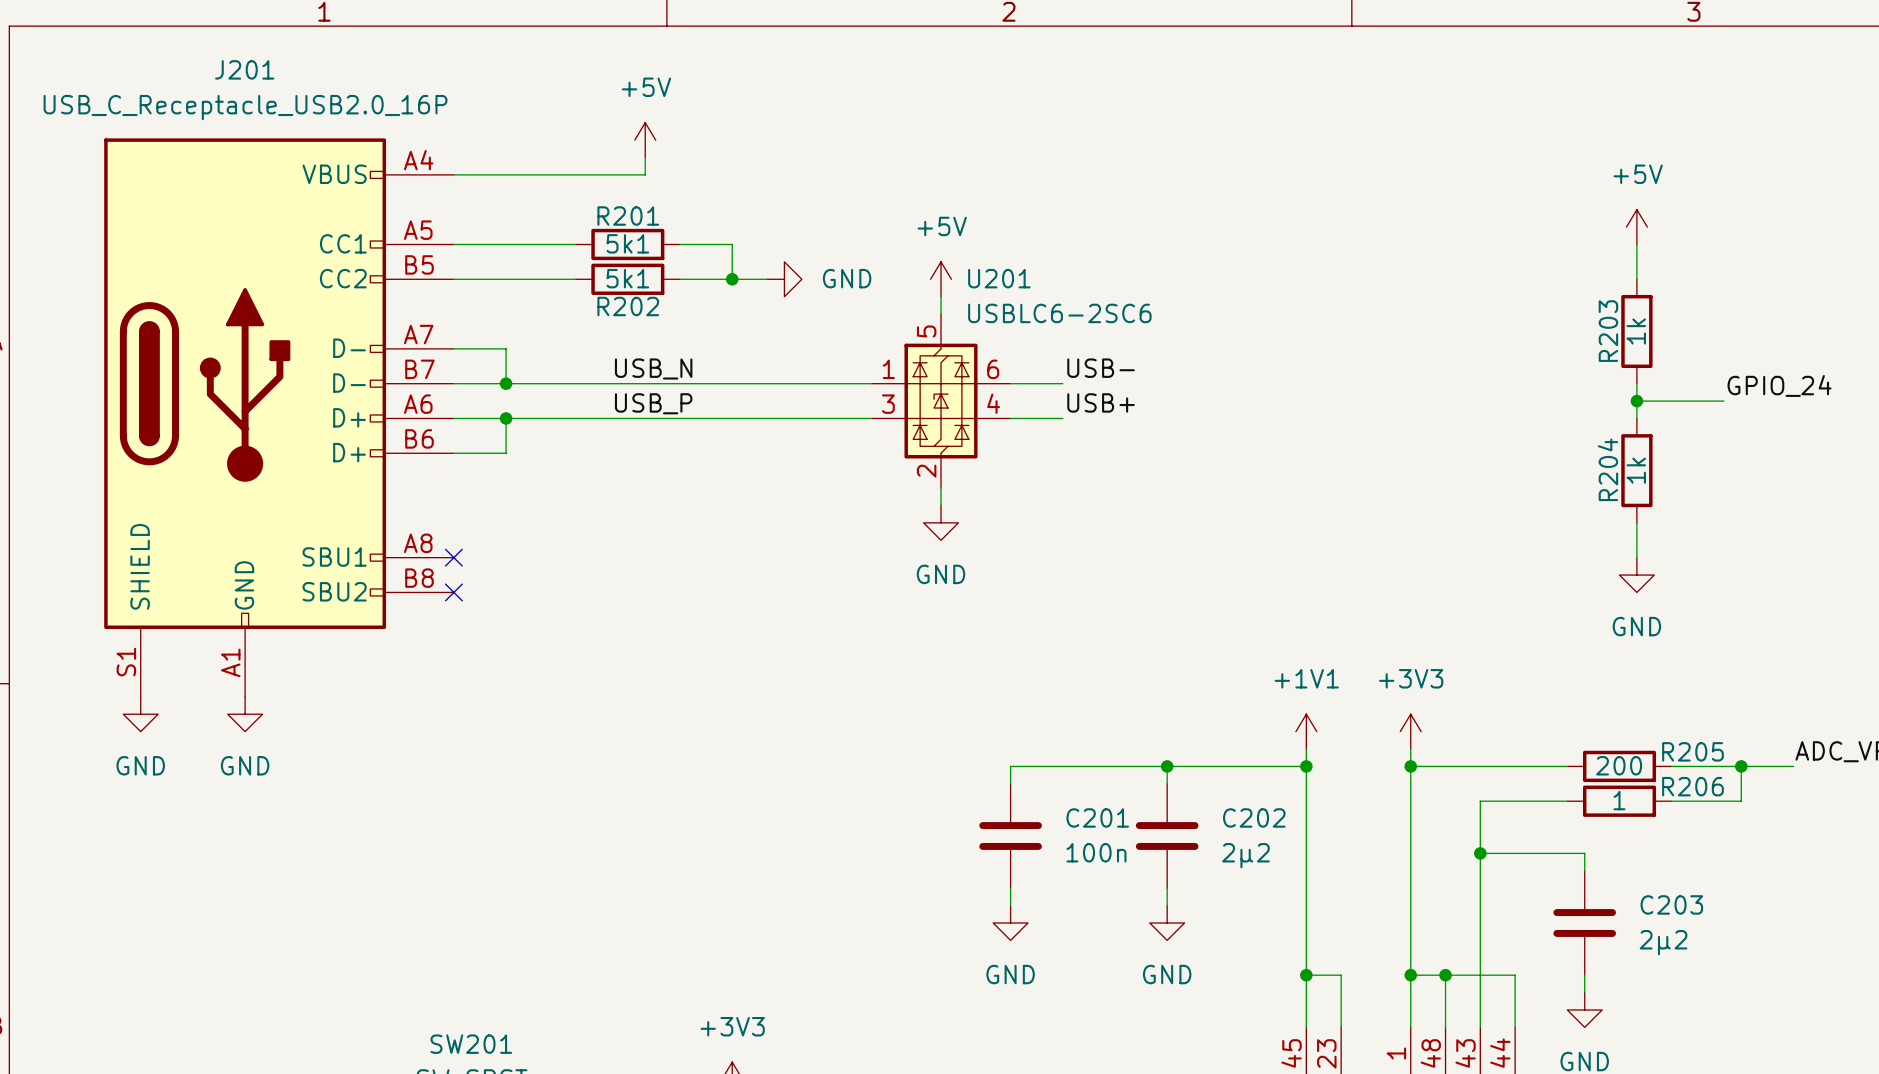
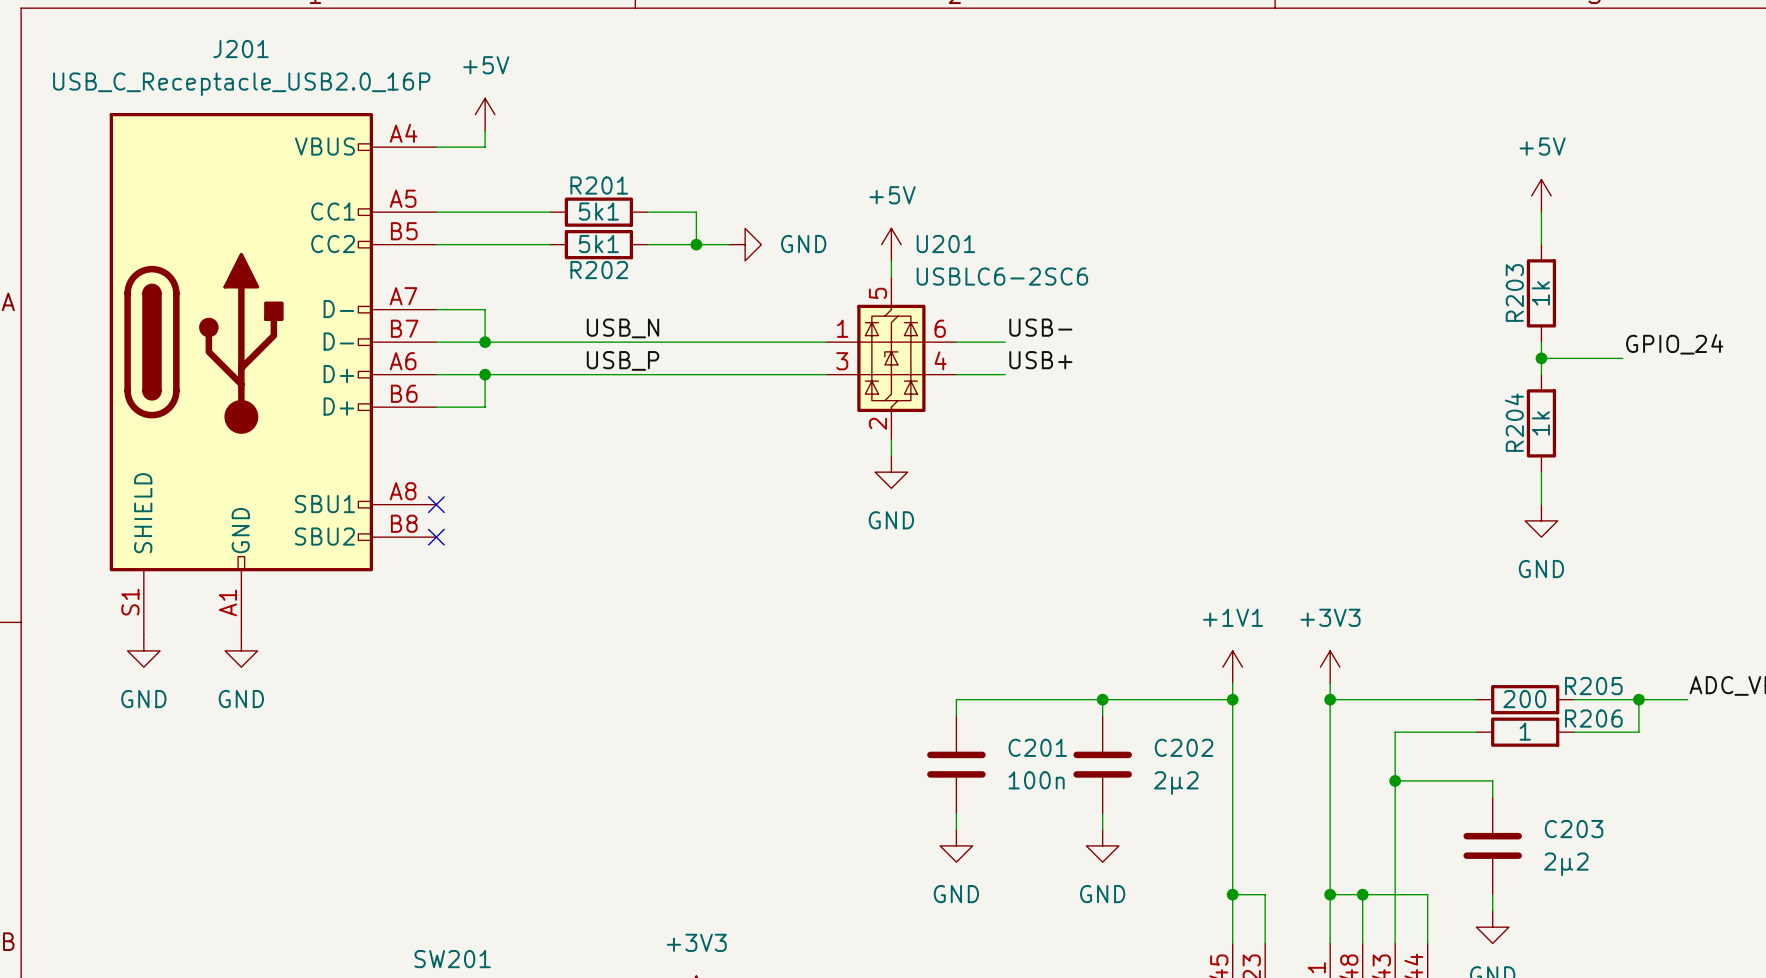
power symbol position: +5V (645, 140) -> +5V (485, 114)
wire: (645, 157) (645, 174) (506, 174) -> (485, 130) (485, 147)

